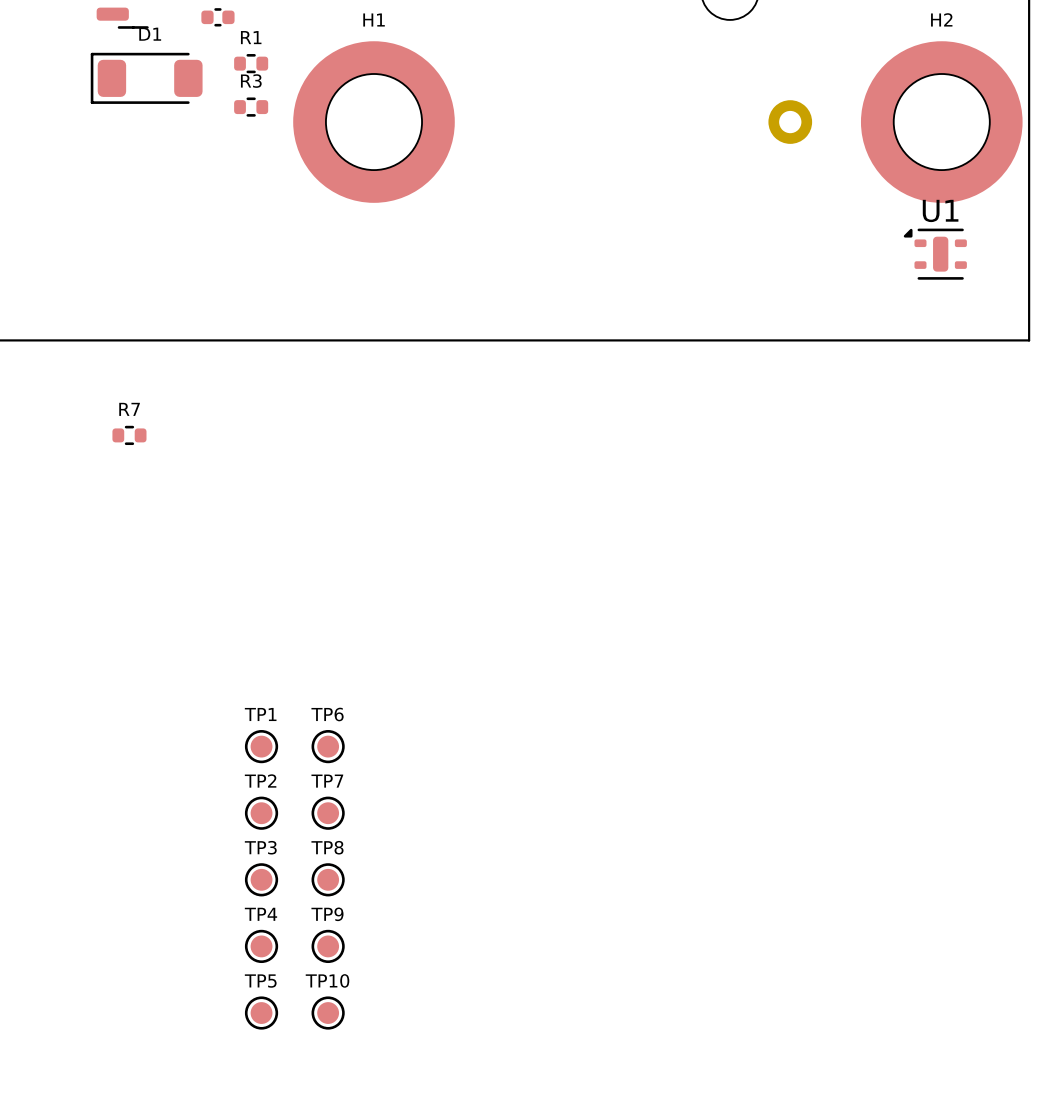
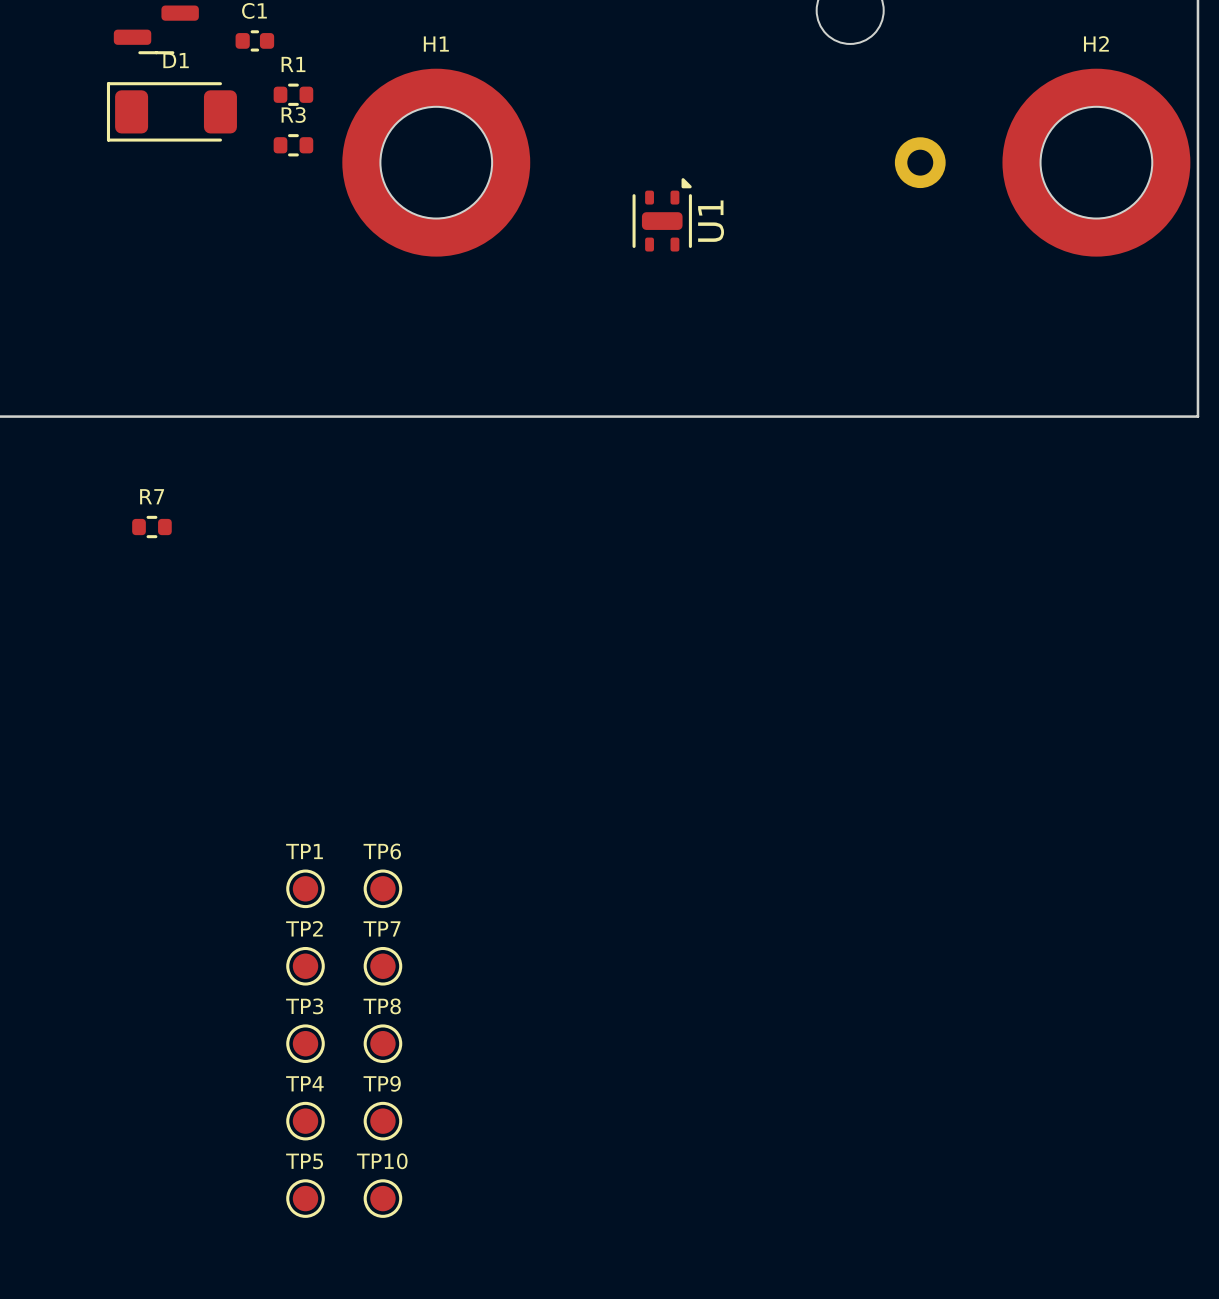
U1 rotation: 0° (935, 254) -> 90° clockwise (662, 214)
U1 position: (935, 254) -> (662, 214)

